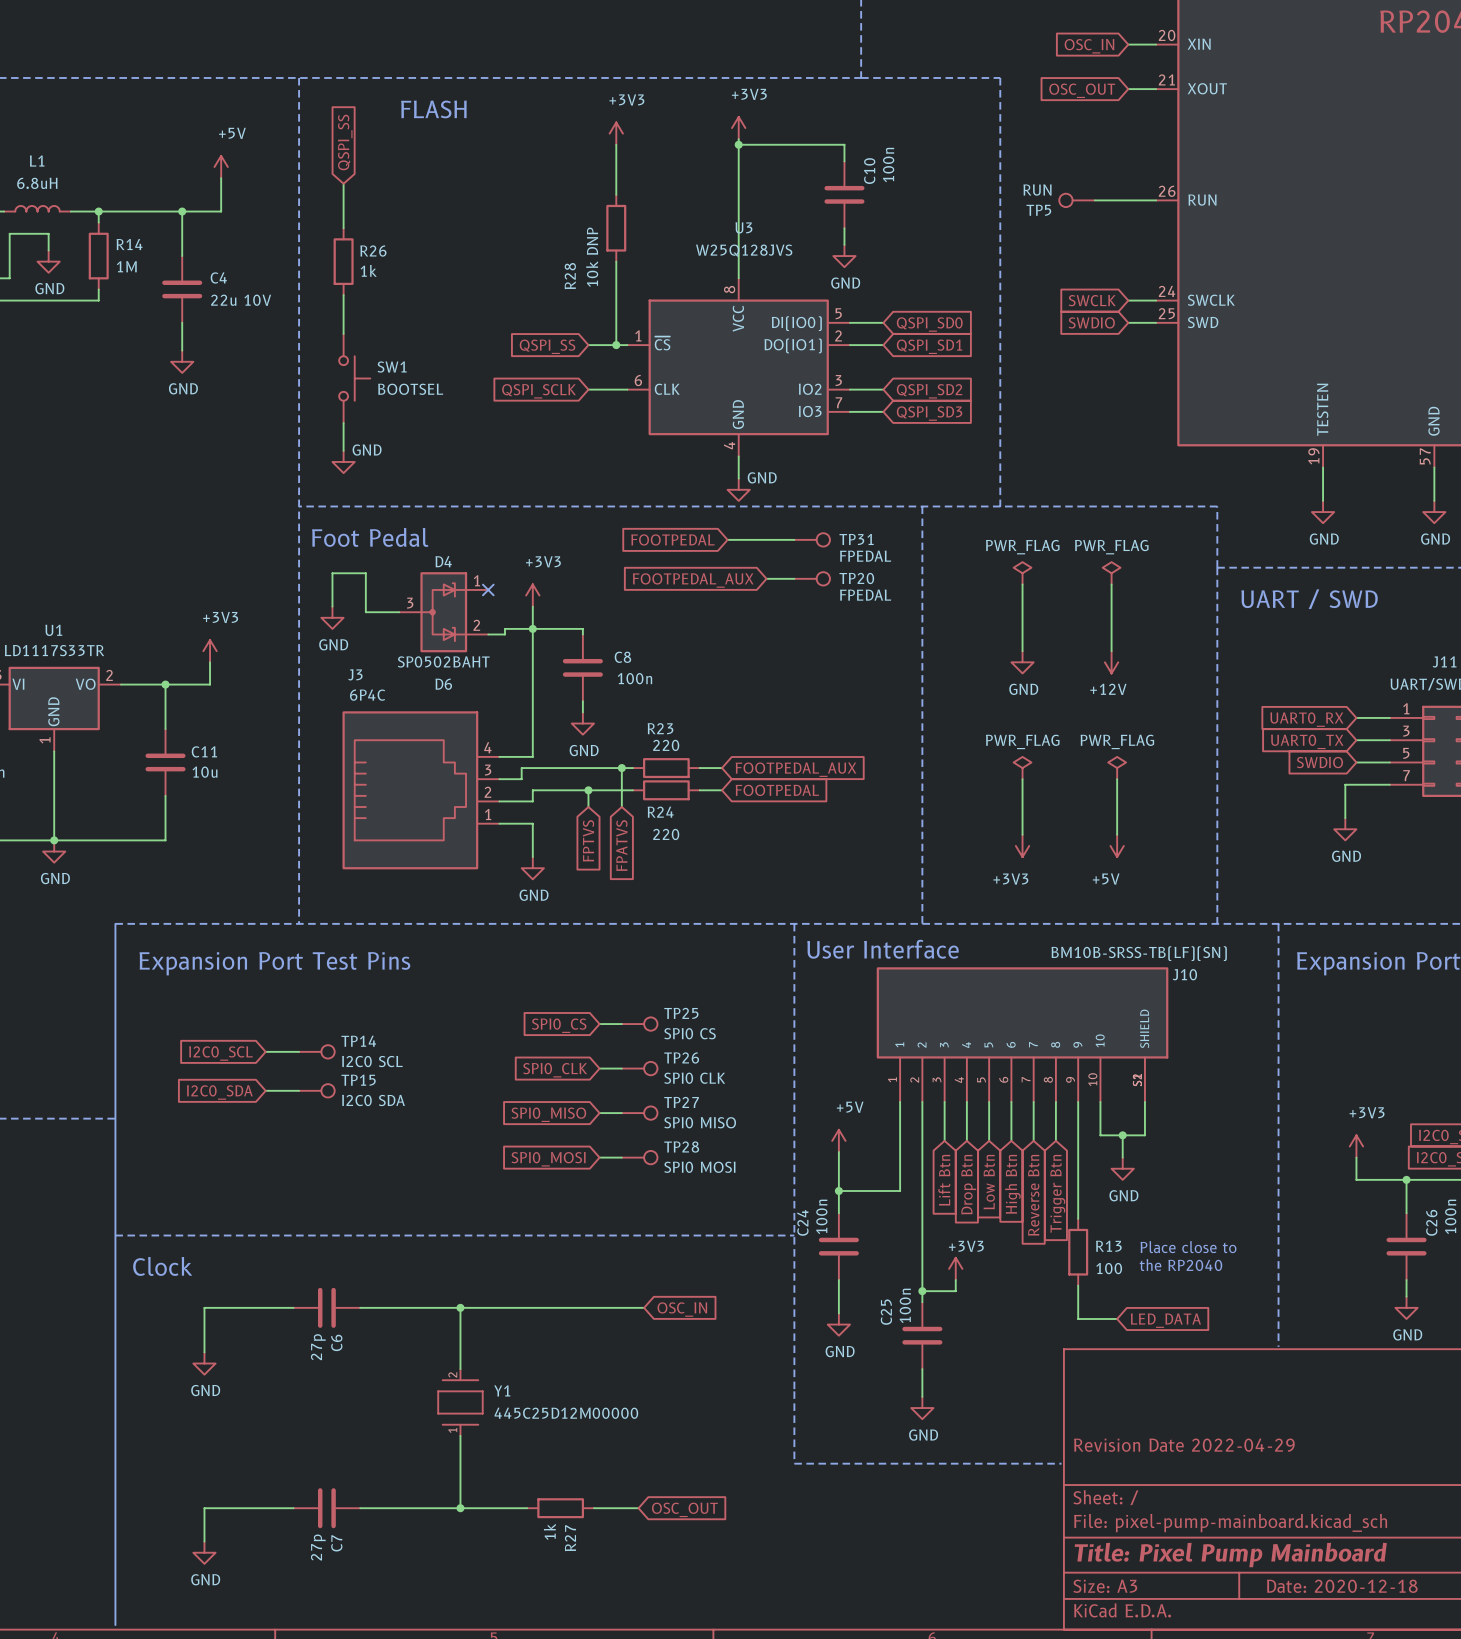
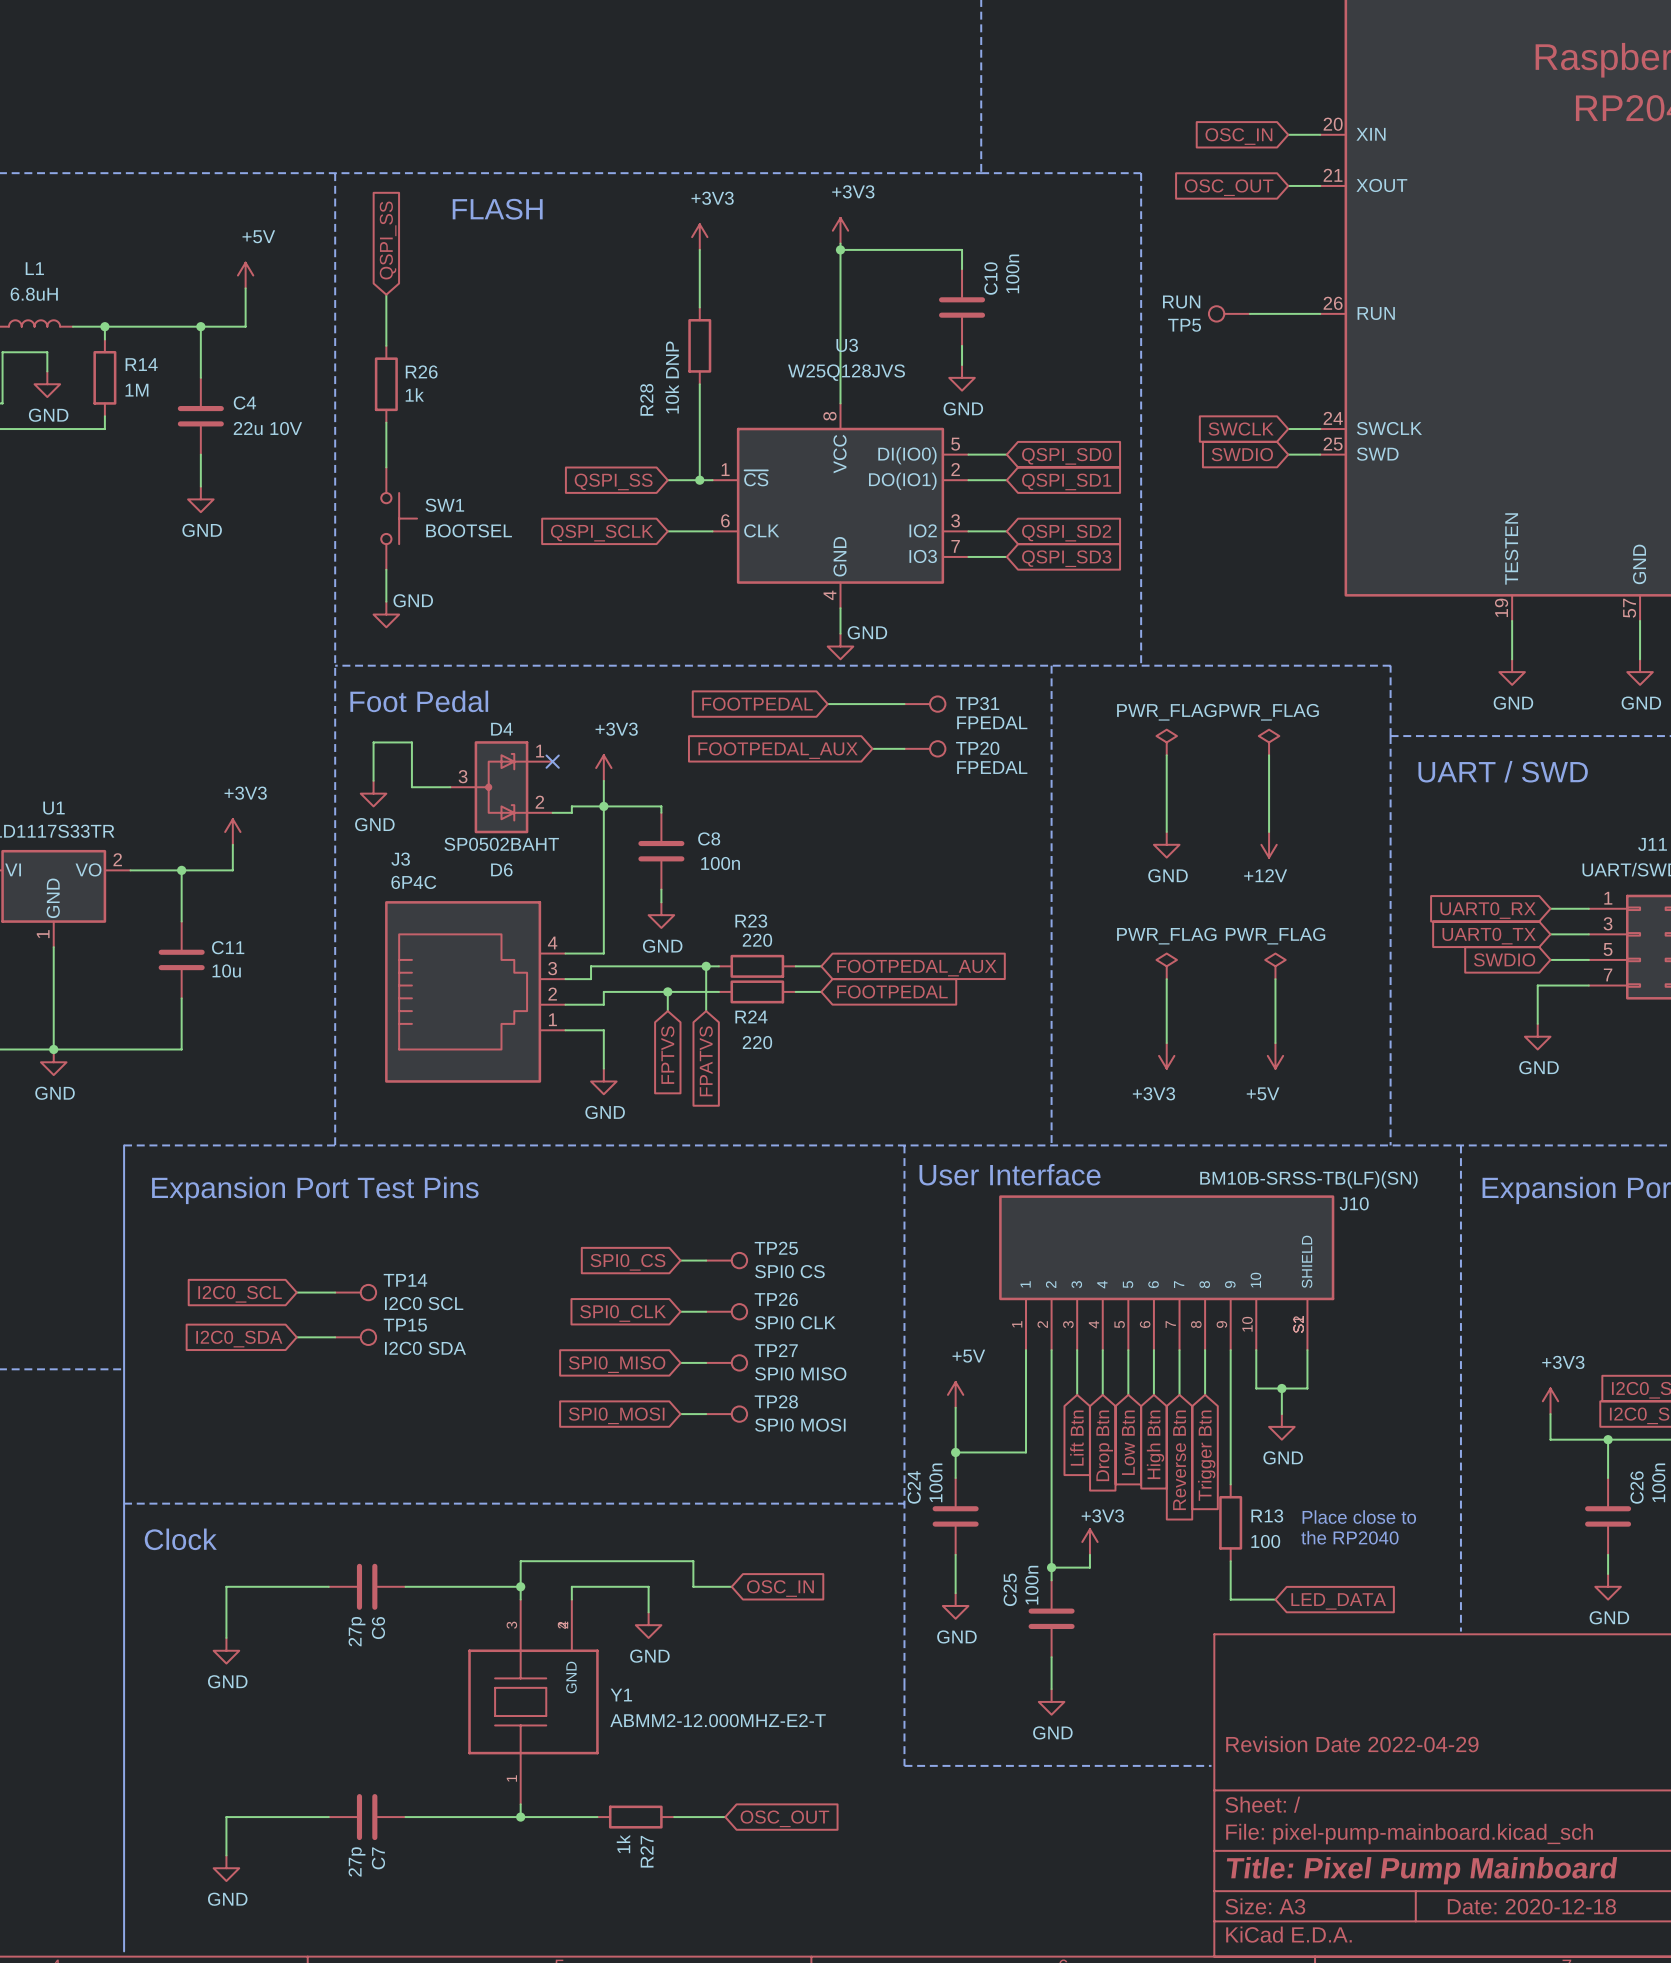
wire: (460, 1307) (504, 1307) -> (571, 1599) (571, 1586)
wire: none -> (520, 1586) (520, 1561) (693, 1561) (693, 1586)
wire: (571, 1307) (610, 1307) -> (648, 1586) (648, 1612)
power symbol: none -> GND (648, 1625)
Y1 symbol: [438, 1369, 483, 1436] -> [468, 1599, 599, 1805]
Y1 name position: Y1 (502, 1390) -> Y1 (621, 1695)
Y1 value: 445C25D12M00000 (566, 1413) -> ABMM2-12.000MHZ-E2-T (718, 1720)

